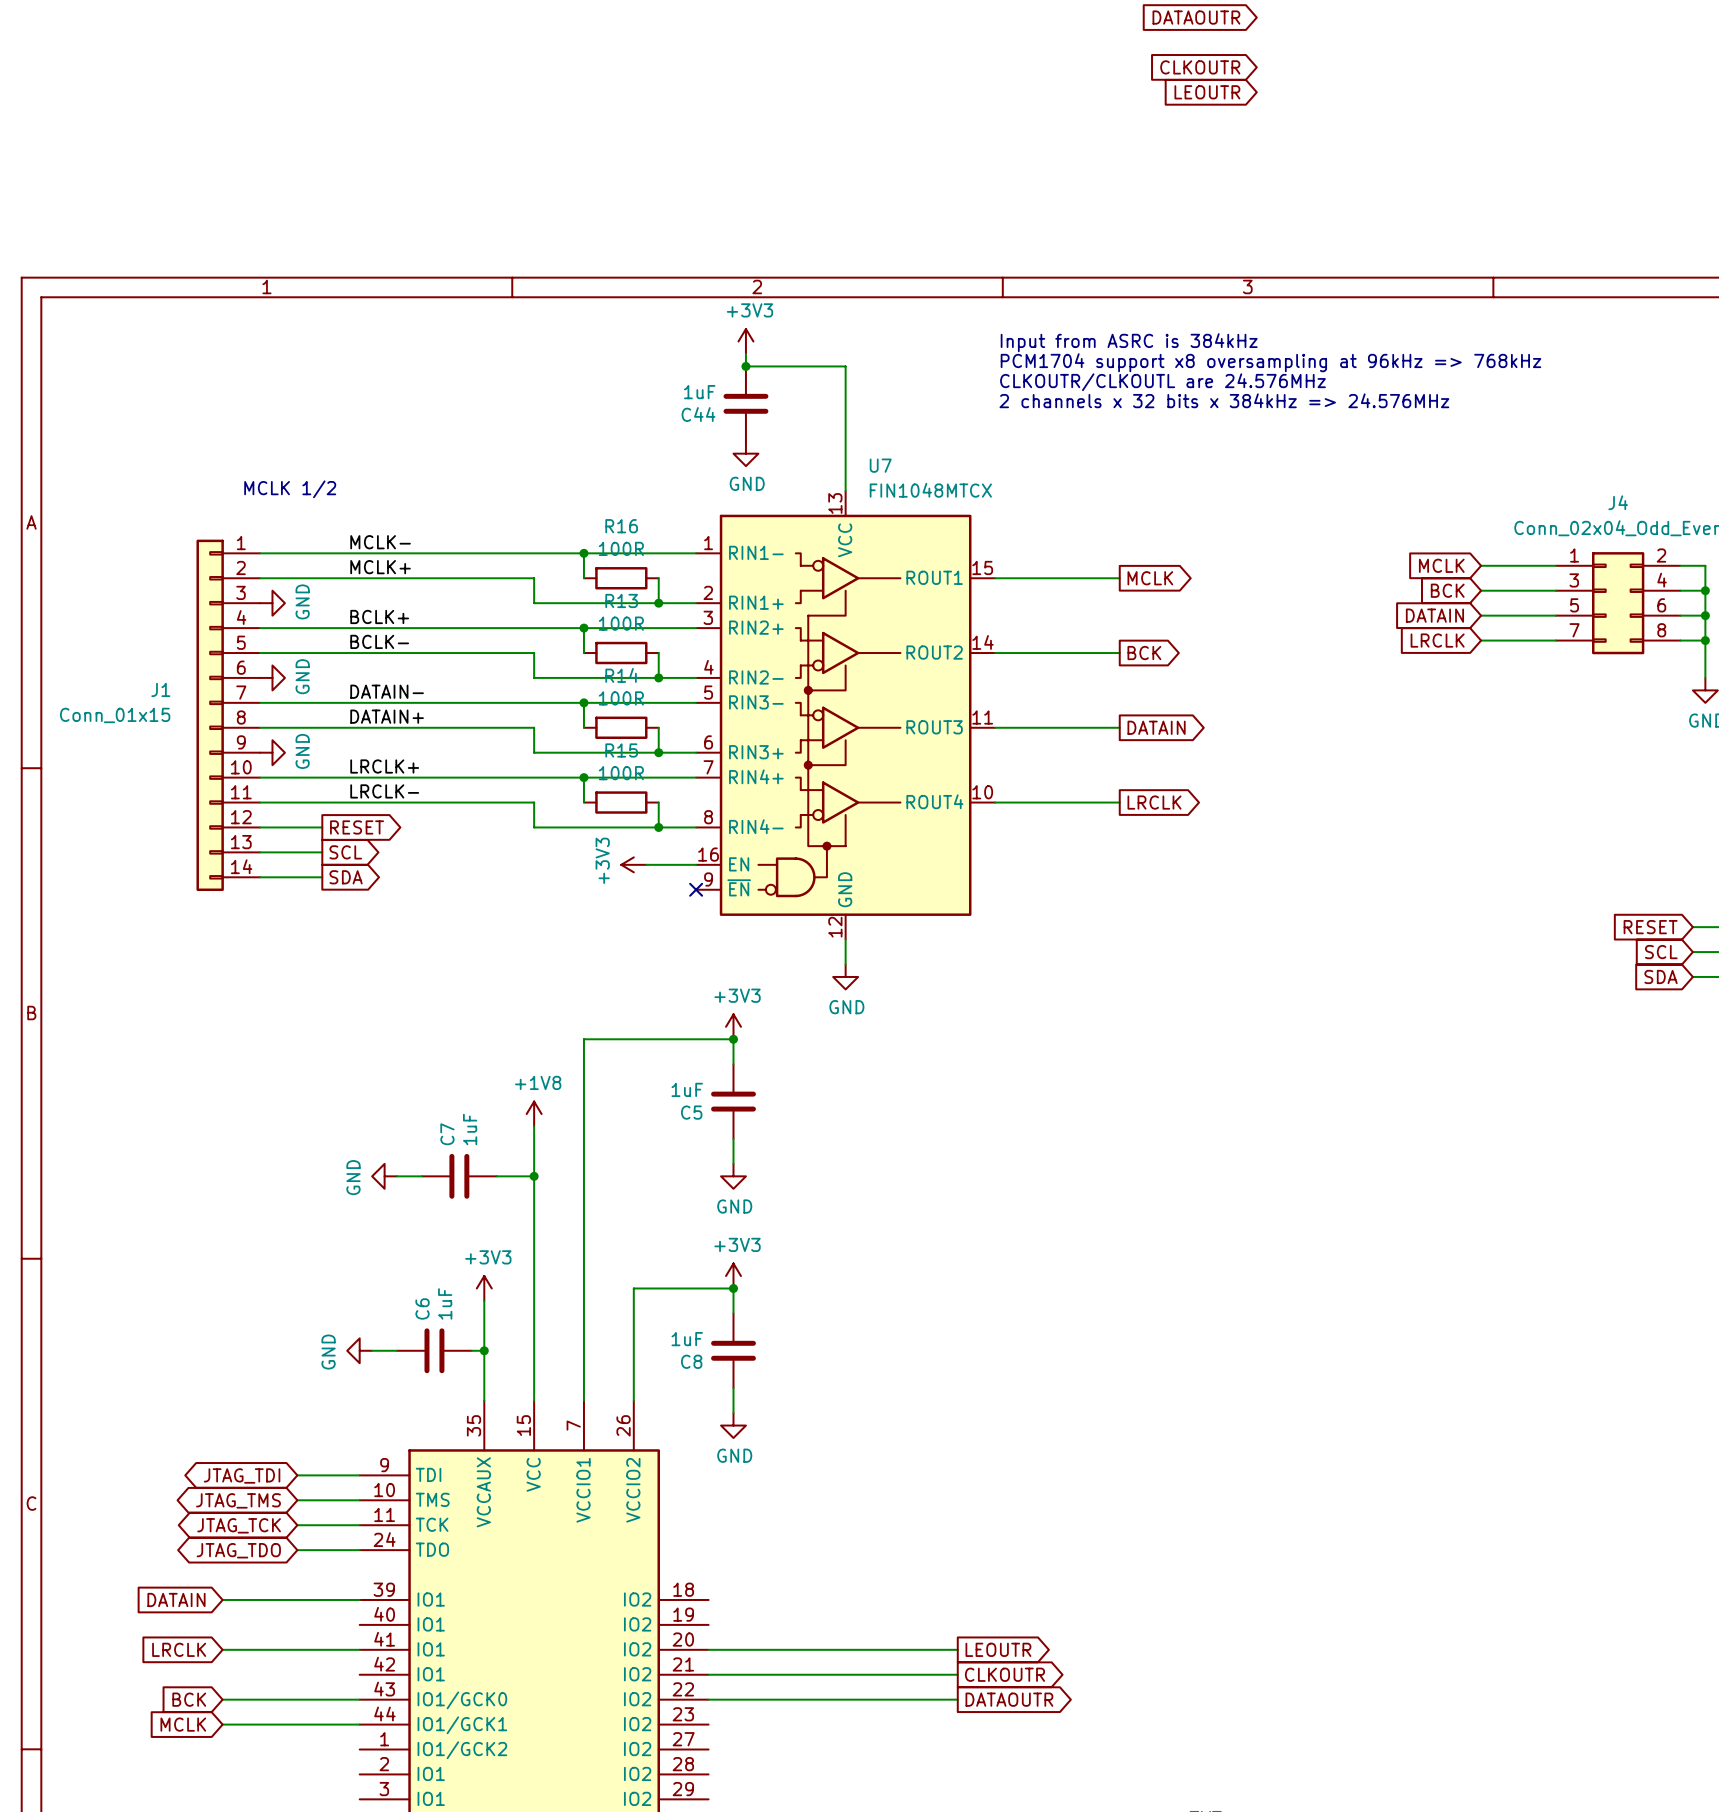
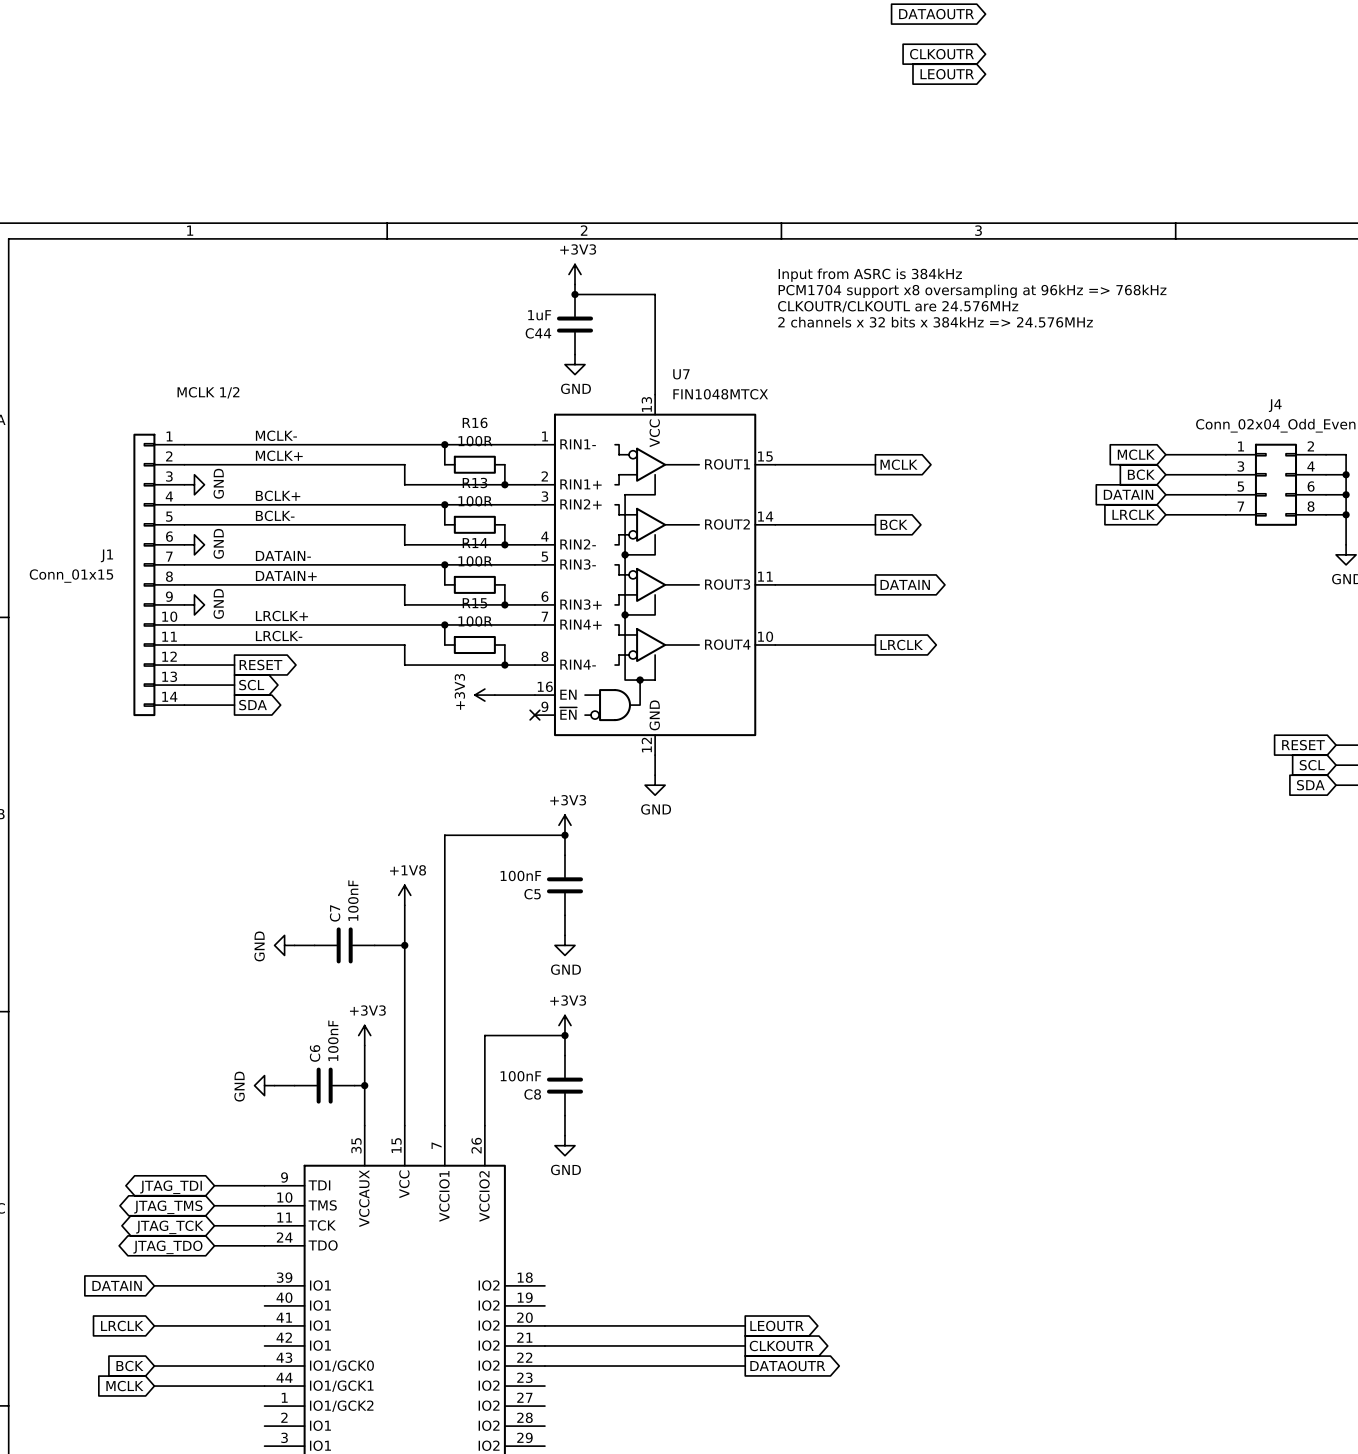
C5 value: 1uF (687, 1089) -> 100nF (520, 875)
C7 value: 1uF (470, 1129) -> 100nF (353, 900)
C6 value: 1uF (445, 1303) -> 100nF (333, 1040)
C8 value: 1uF (687, 1339) -> 100nF (520, 1076)

